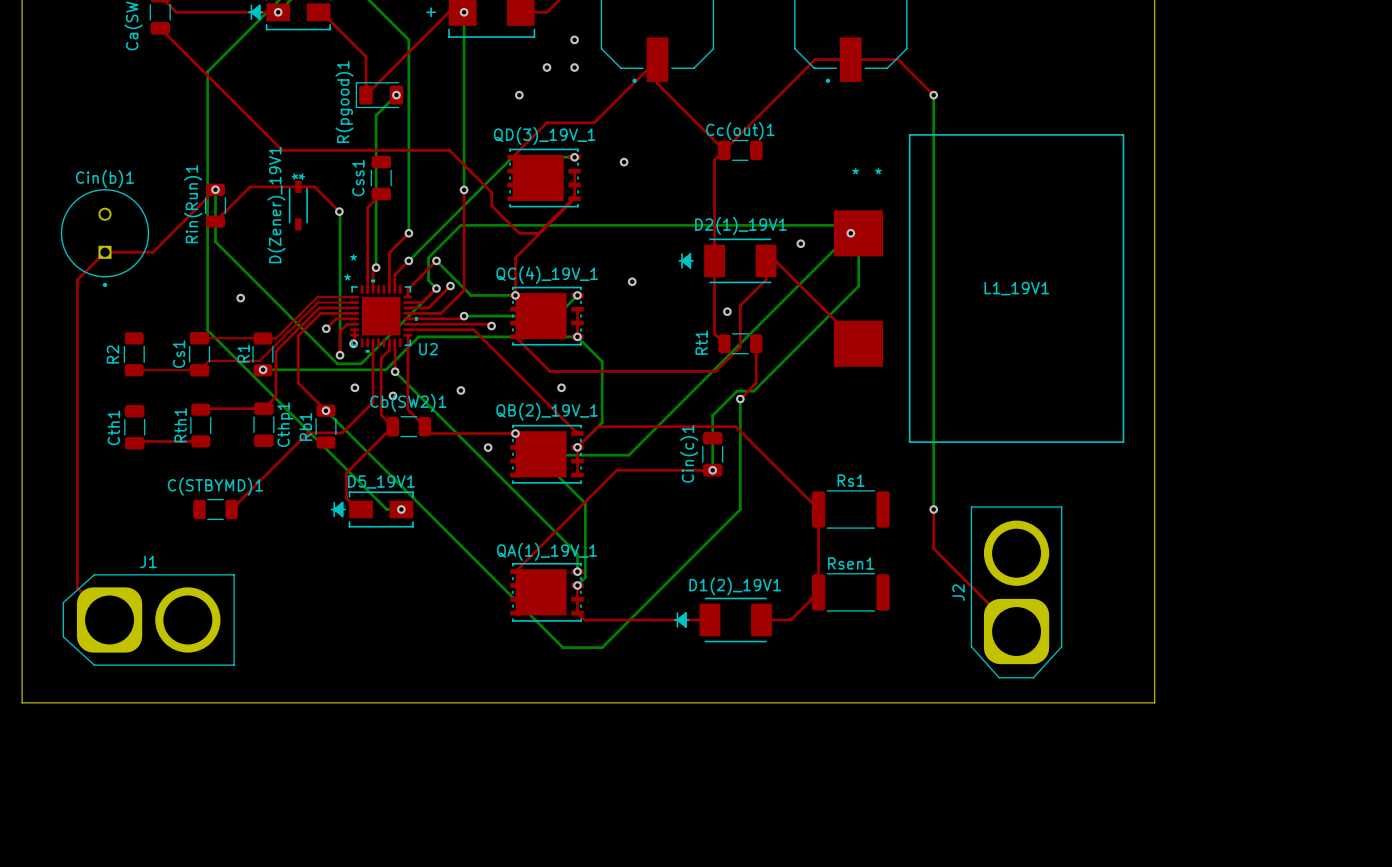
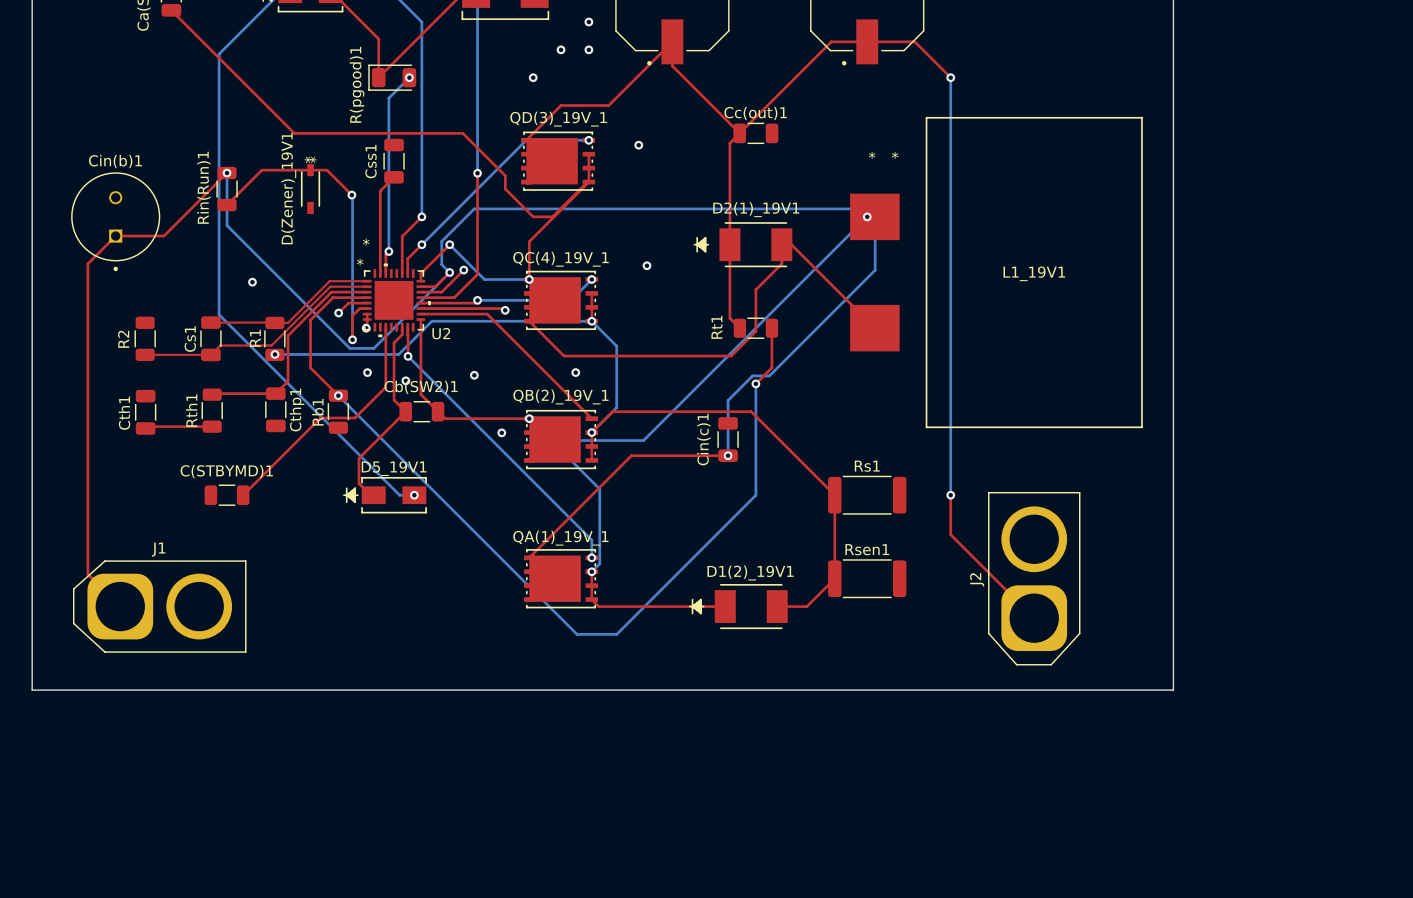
via: (800, 243) -> none
via: (727, 311) -> none

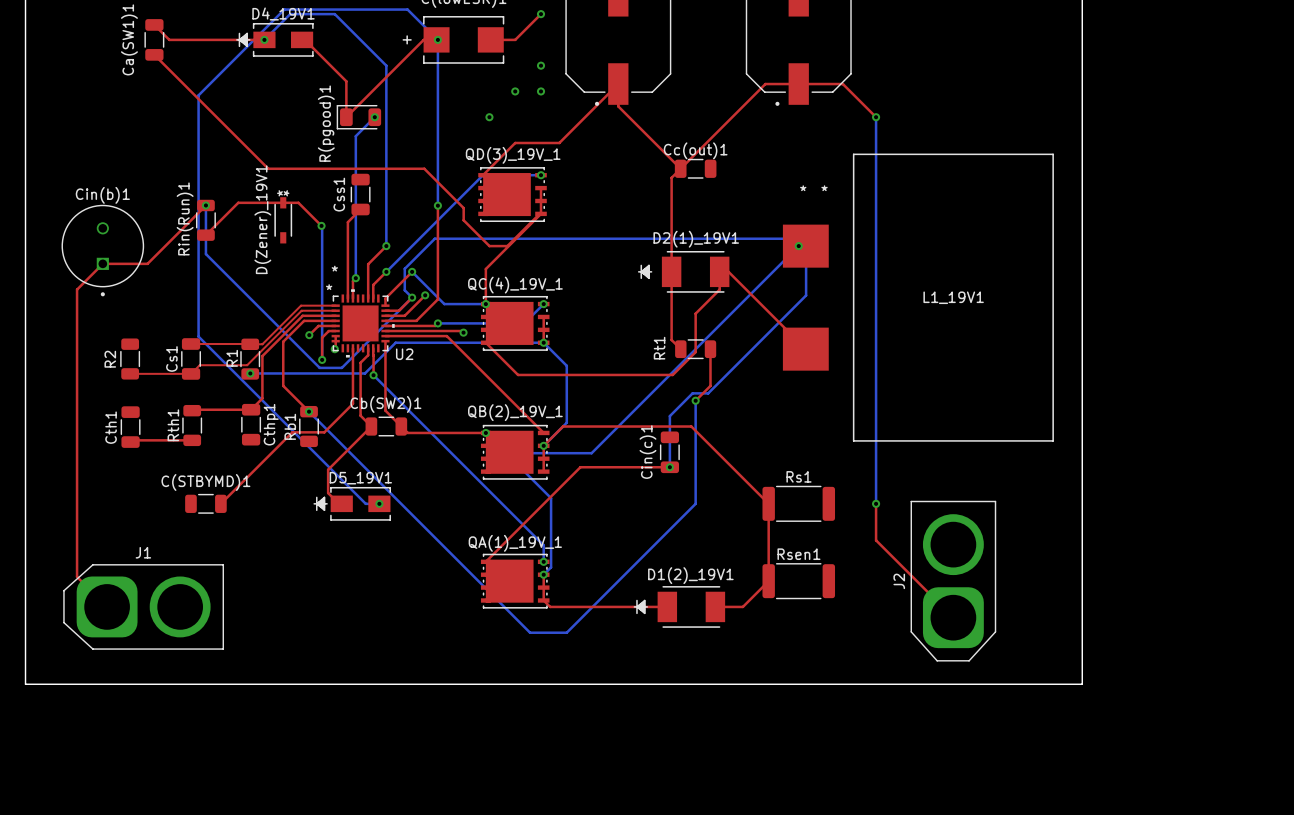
via: (638, 145) -> none
via: (646, 265) -> none
via: (252, 282) -> none
via: (367, 372) -> none
via: (575, 372) -> none
via: (474, 375) -> none
via: (405, 380) -> none
via: (501, 432) -> none

